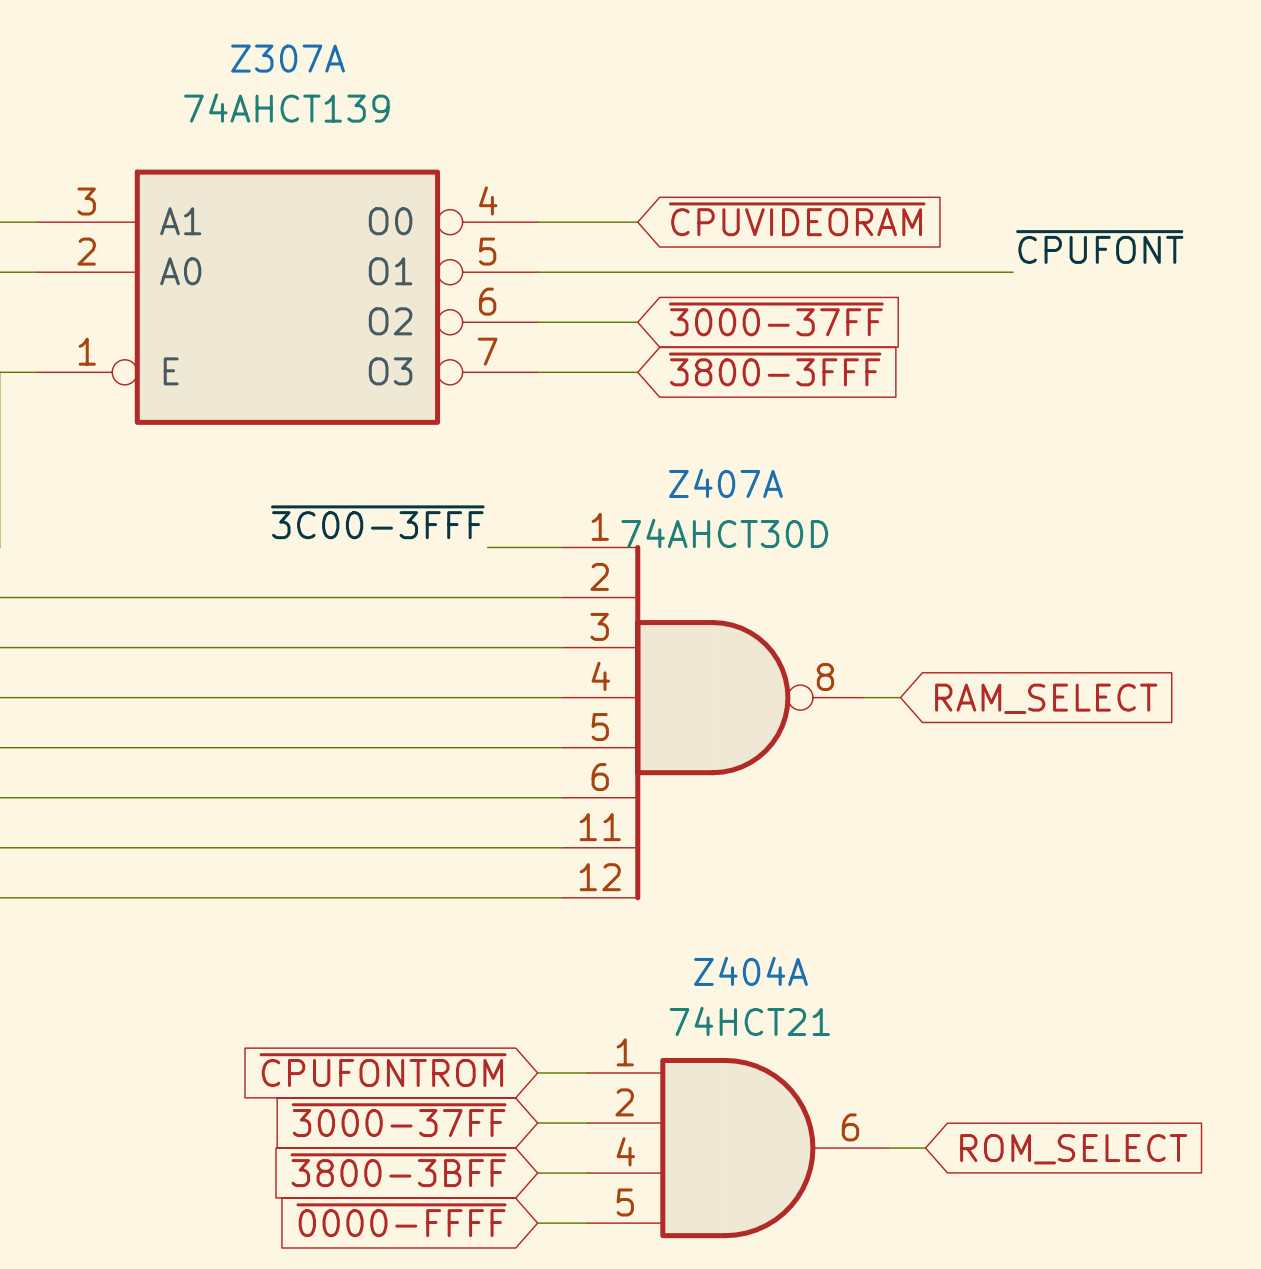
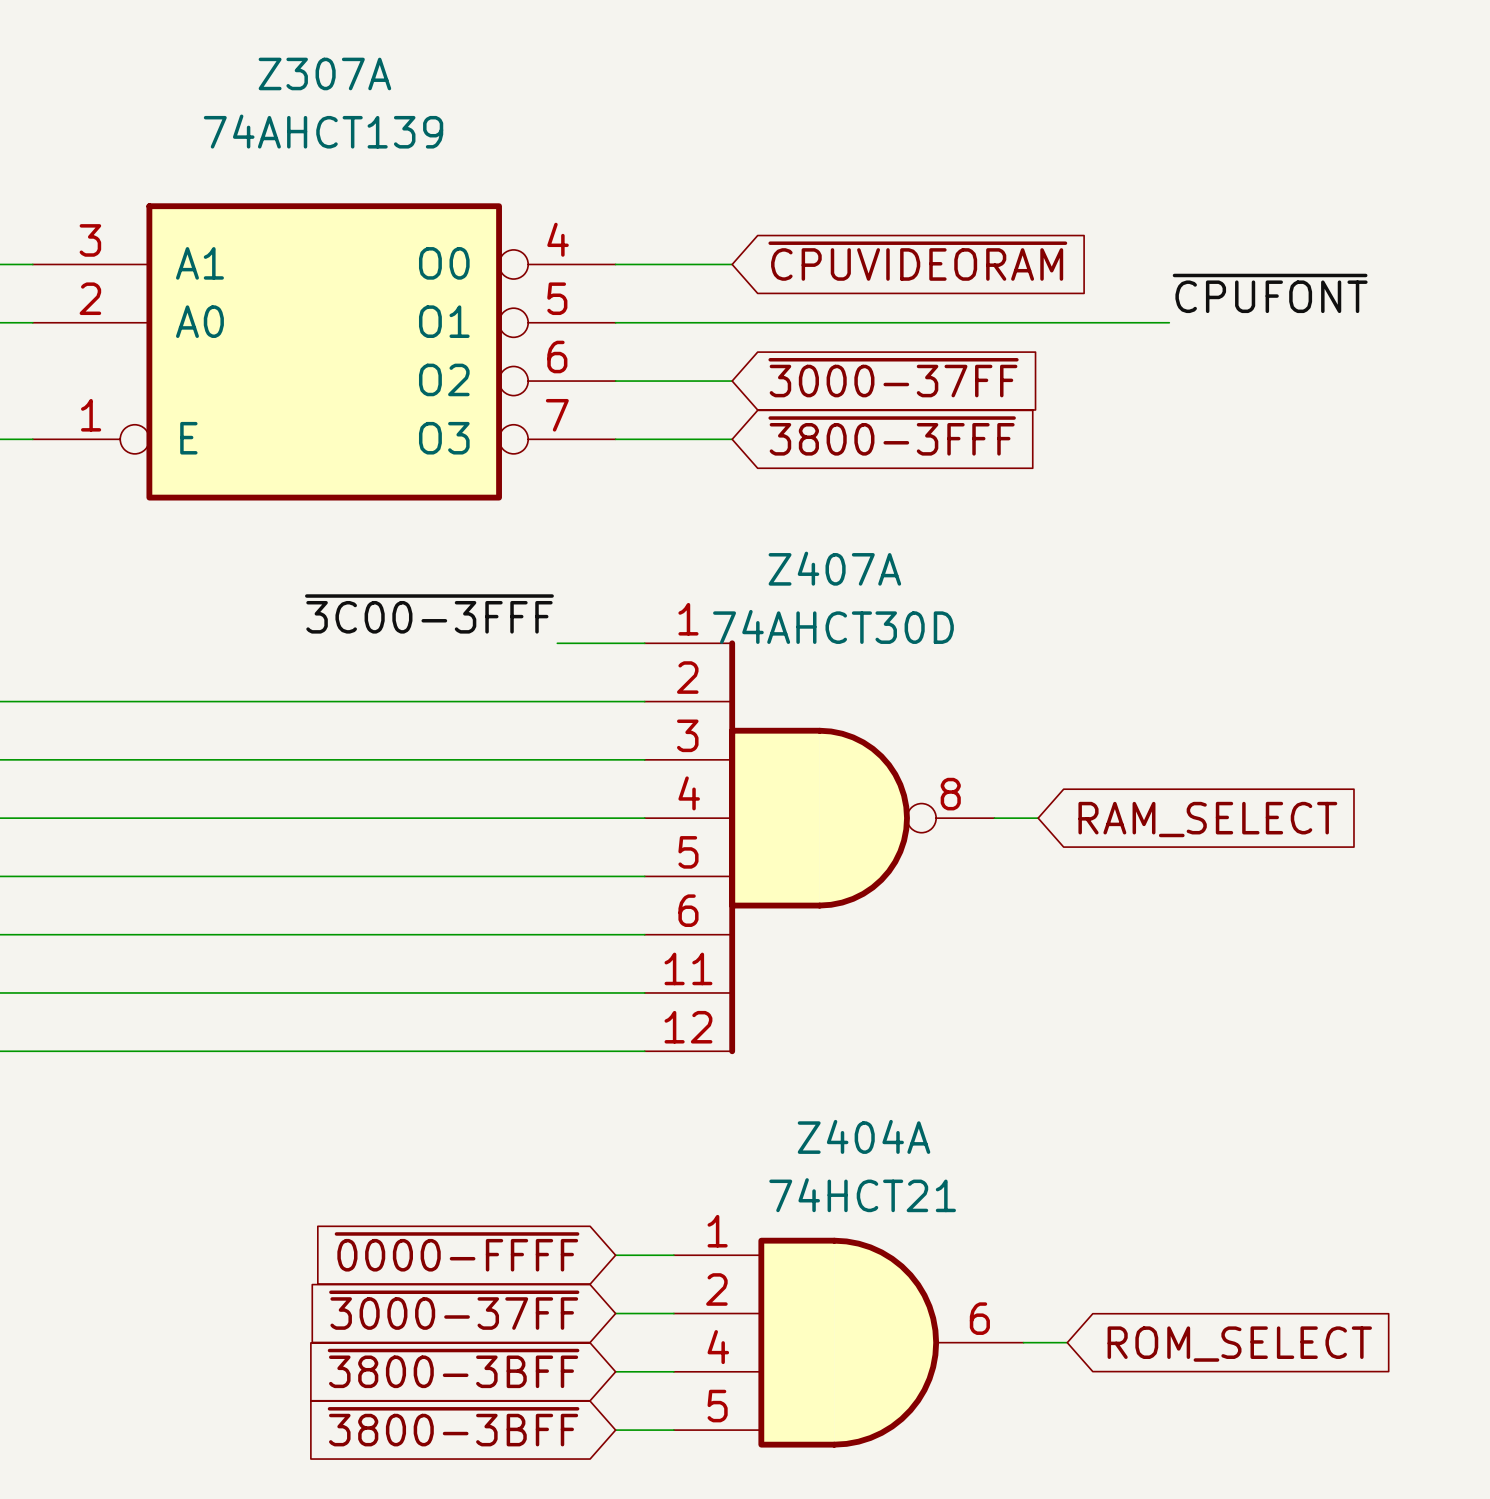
global label: ~{CPUFONTROM} (383, 1070) -> ~{0000-FFFF} (457, 1251)
global label: ~{0000-FFFF} (401, 1220) -> ~{3800-3BFF} (453, 1426)

